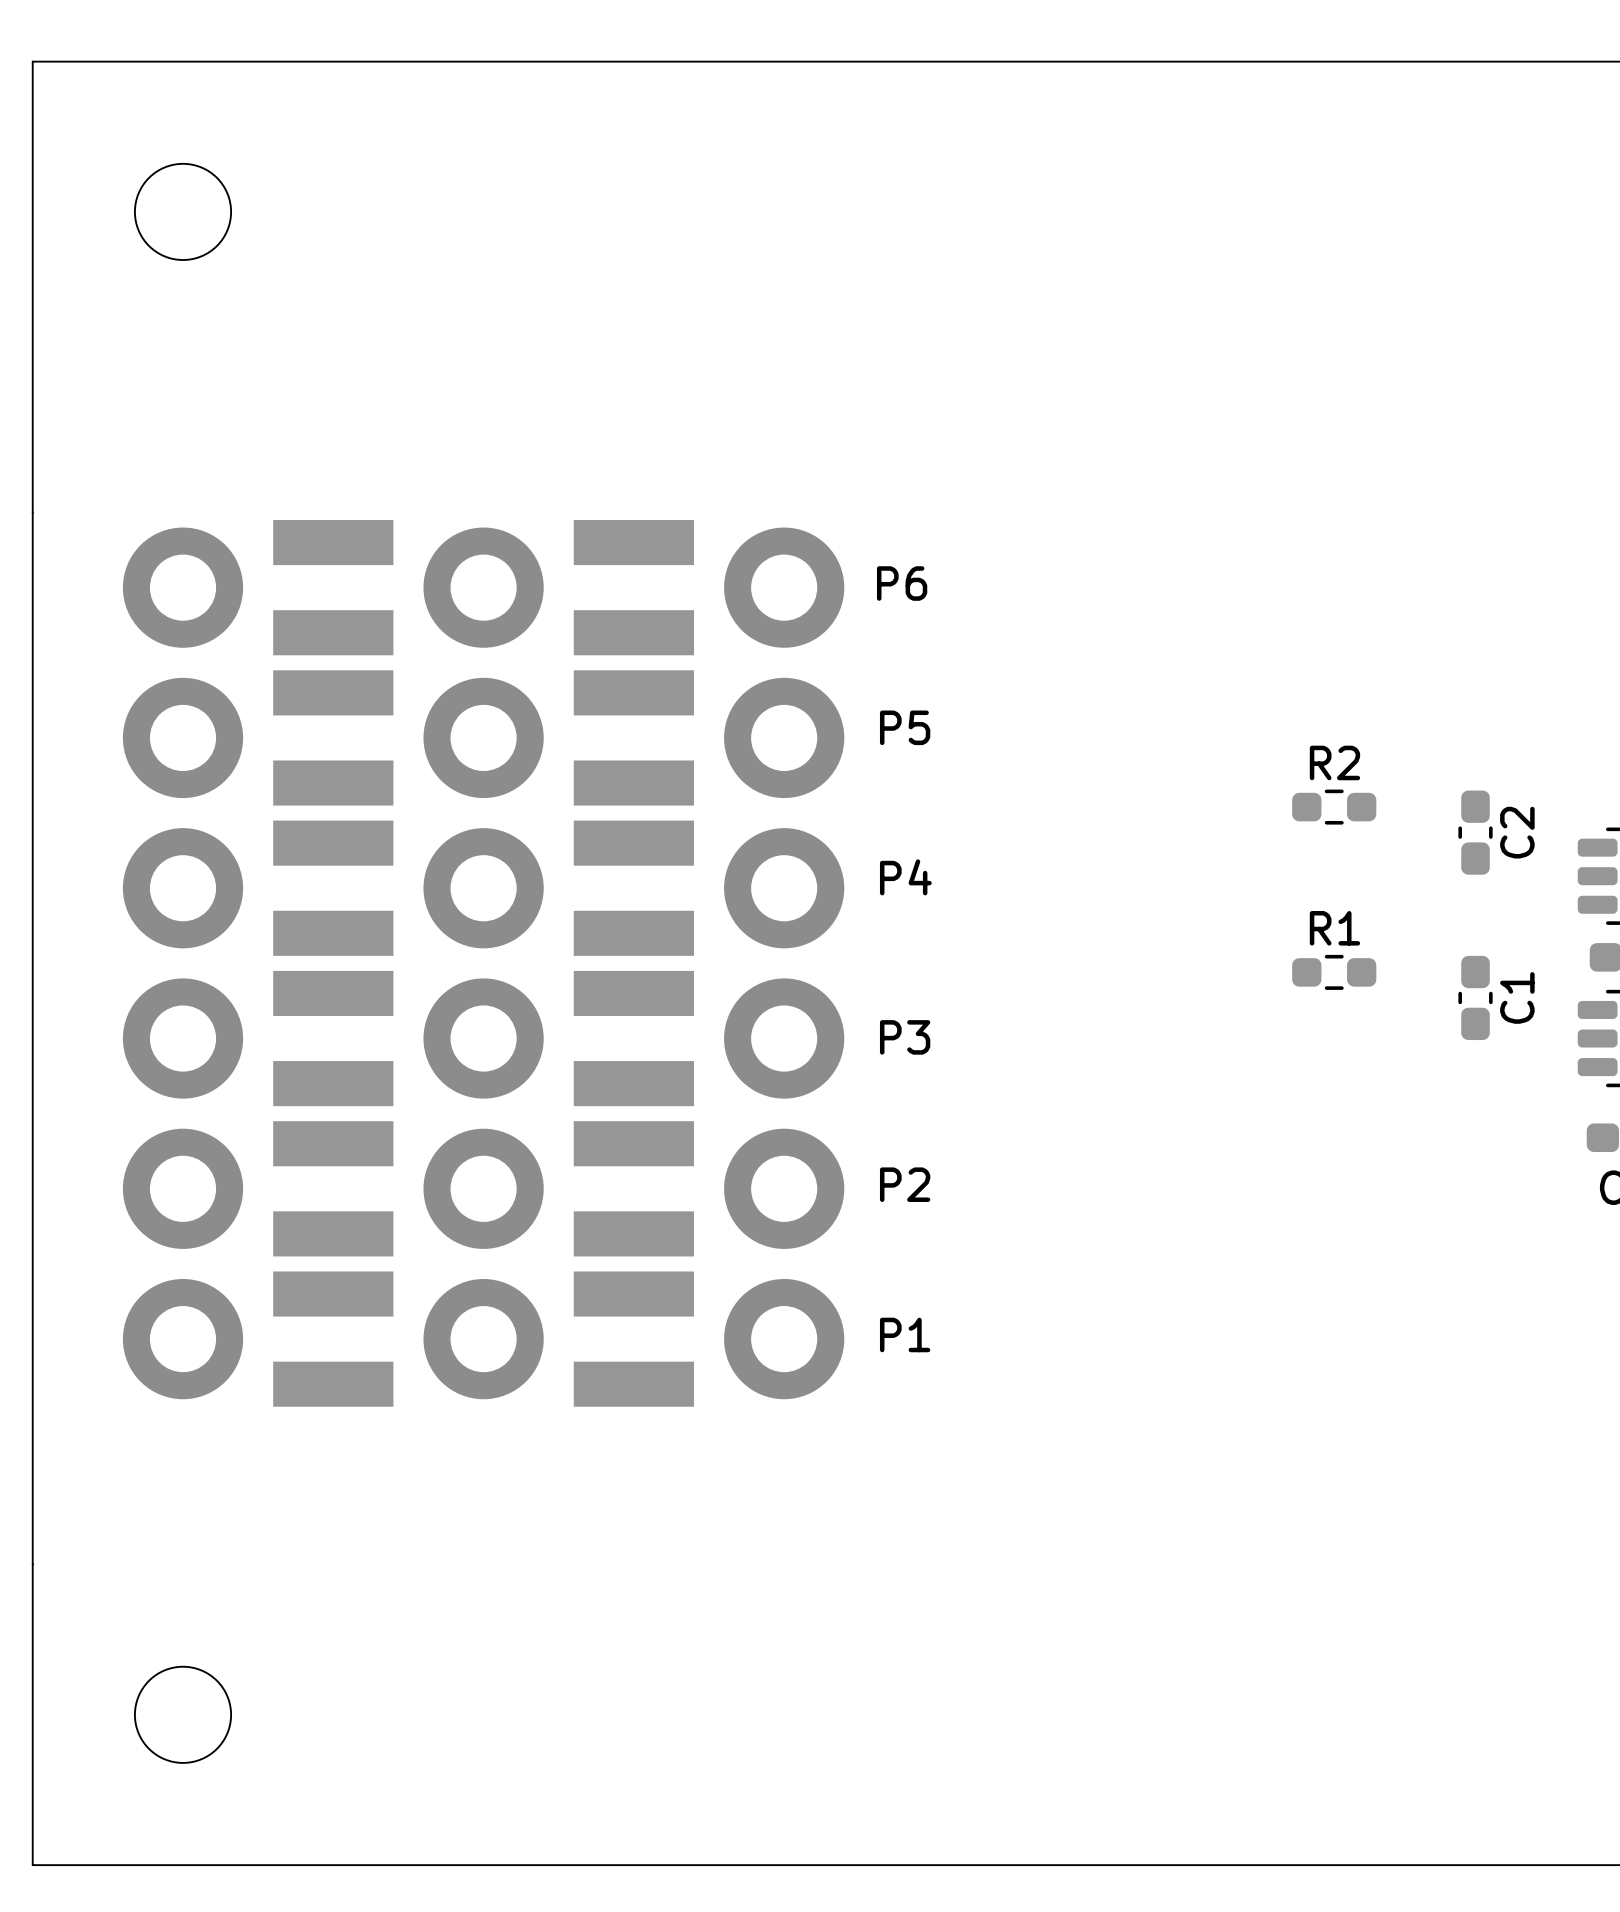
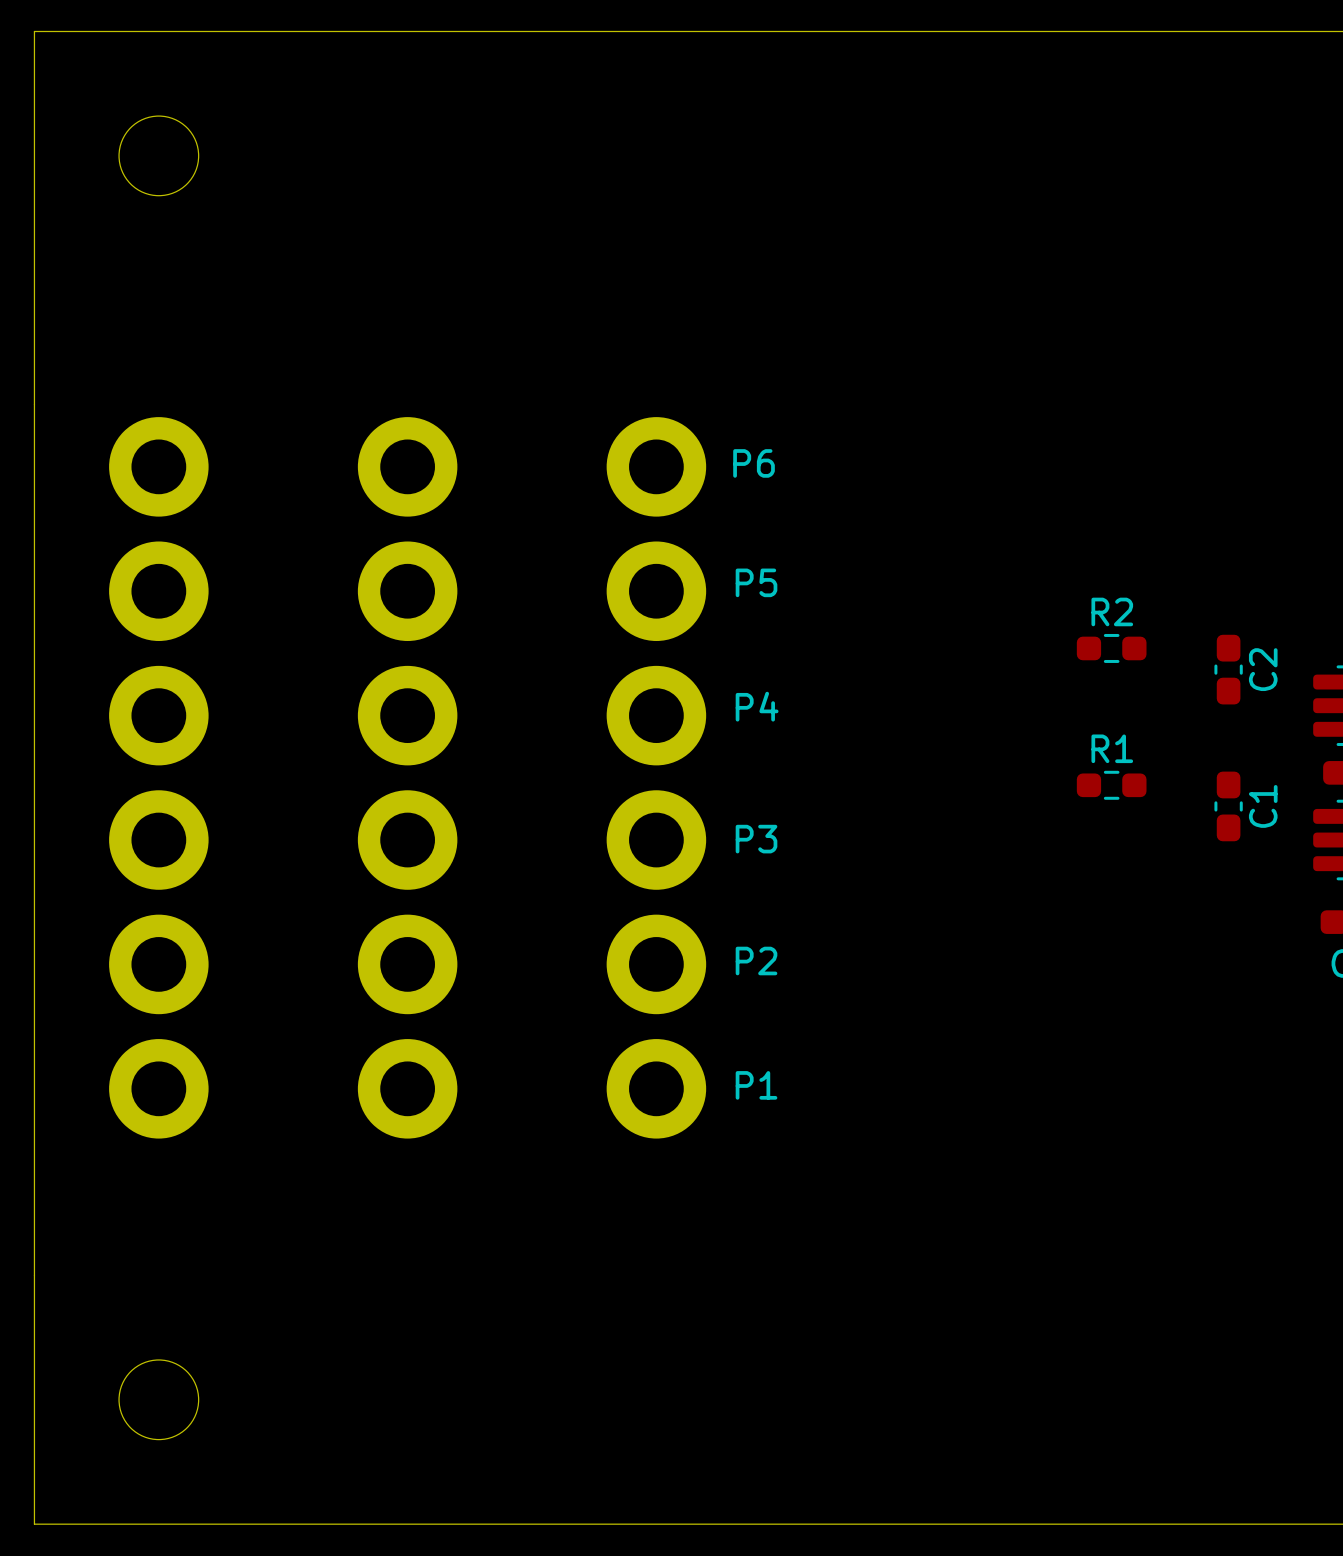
P6 footprint: [122, 520, 845, 656] -> [109, 417, 707, 517]
P5 footprint: [122, 670, 845, 806] -> [109, 541, 707, 642]
P4 footprint: [122, 820, 845, 956] -> [109, 665, 707, 766]
P3 footprint: [122, 970, 845, 1107] -> [109, 790, 707, 890]
P2 footprint: [122, 1121, 845, 1257] -> [109, 914, 707, 1015]
P1 footprint: [122, 1271, 845, 1407] -> [109, 1039, 707, 1139]

